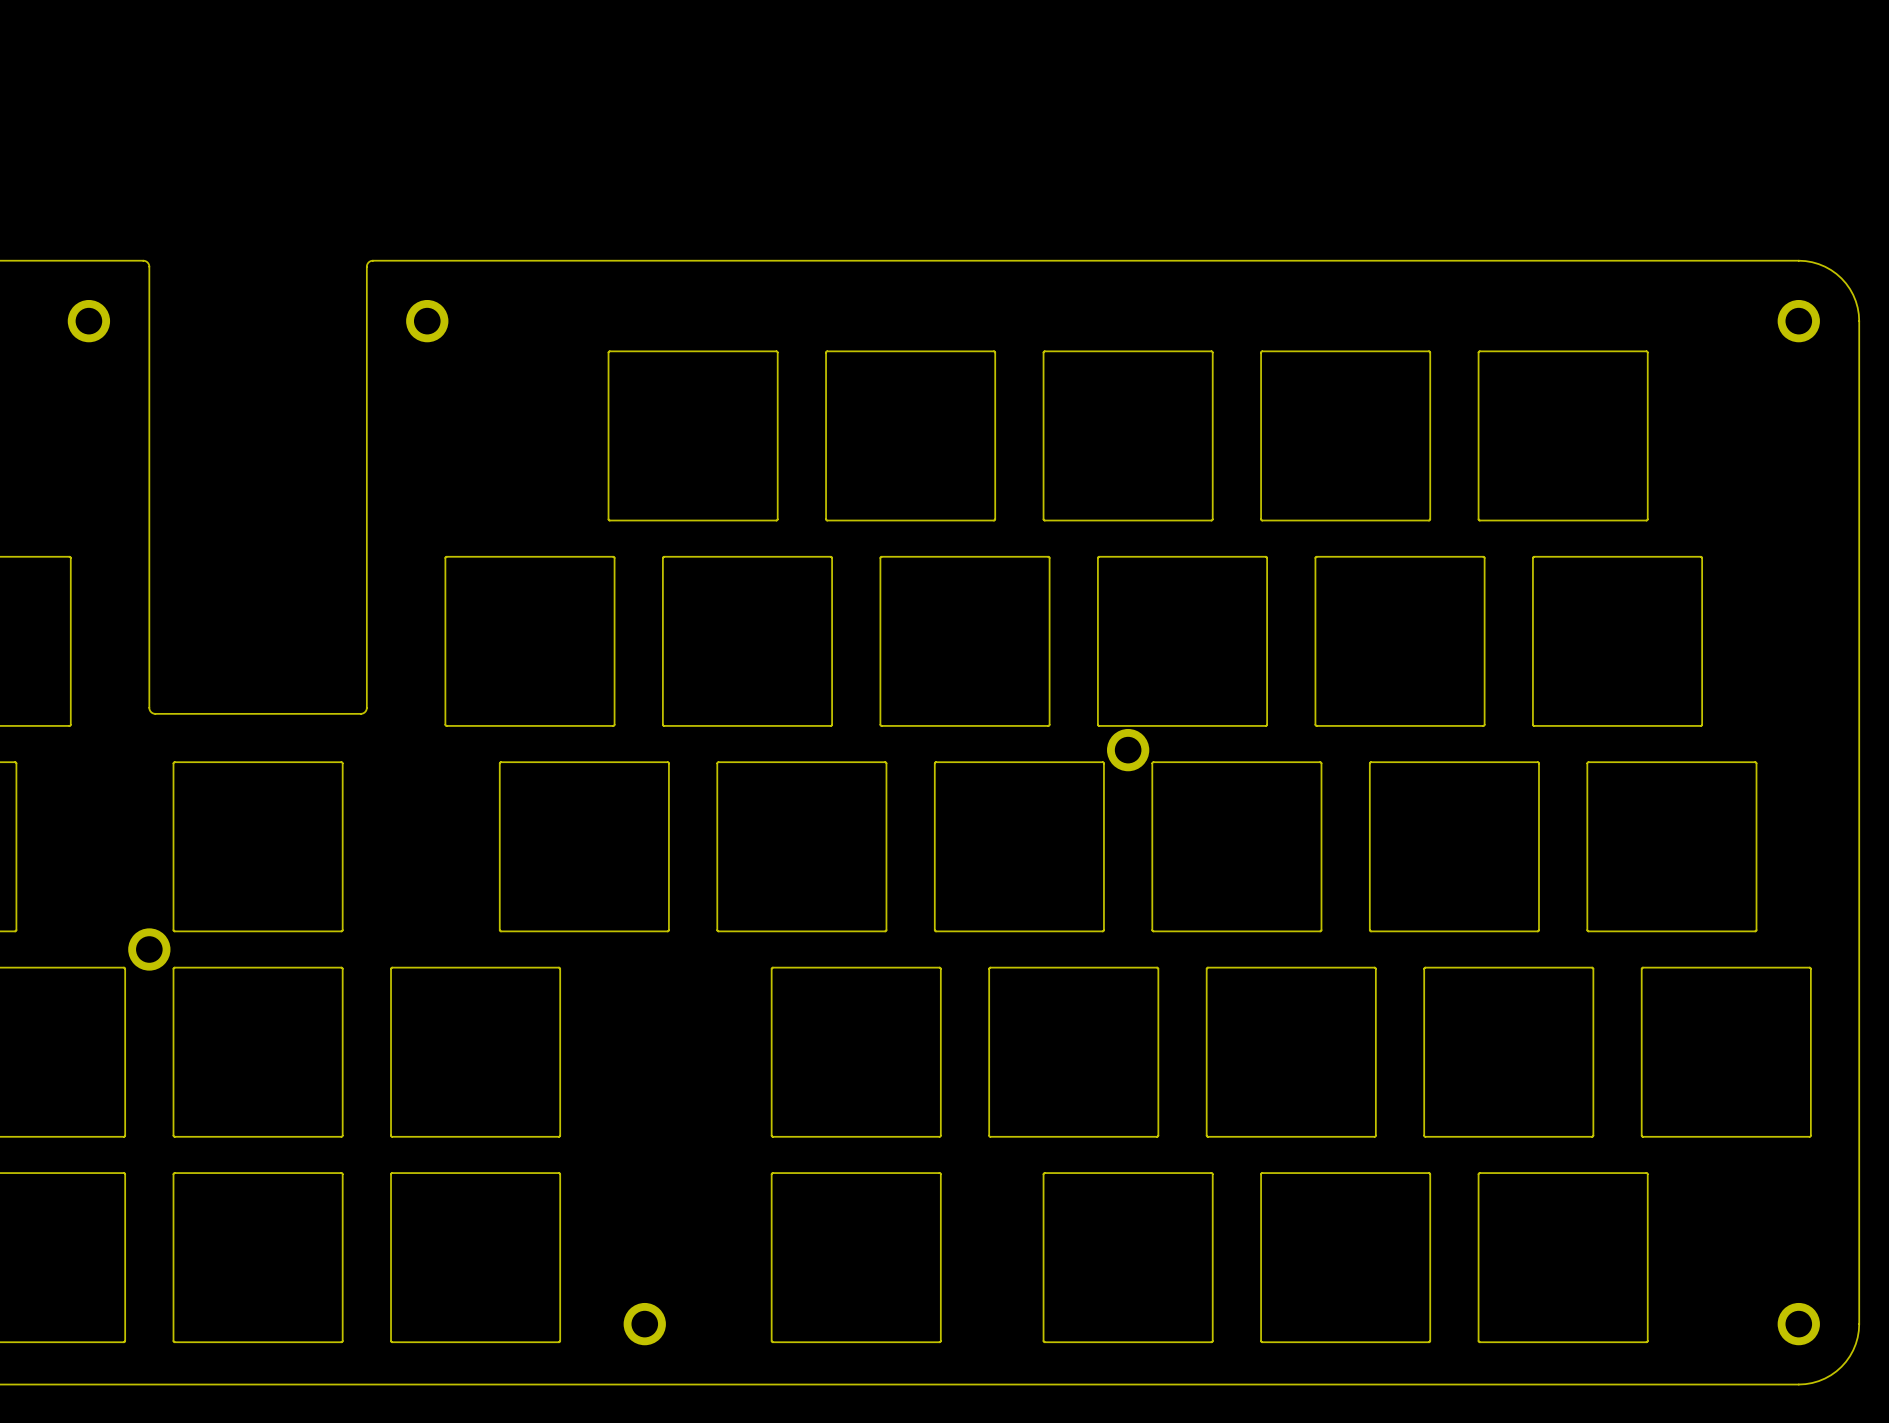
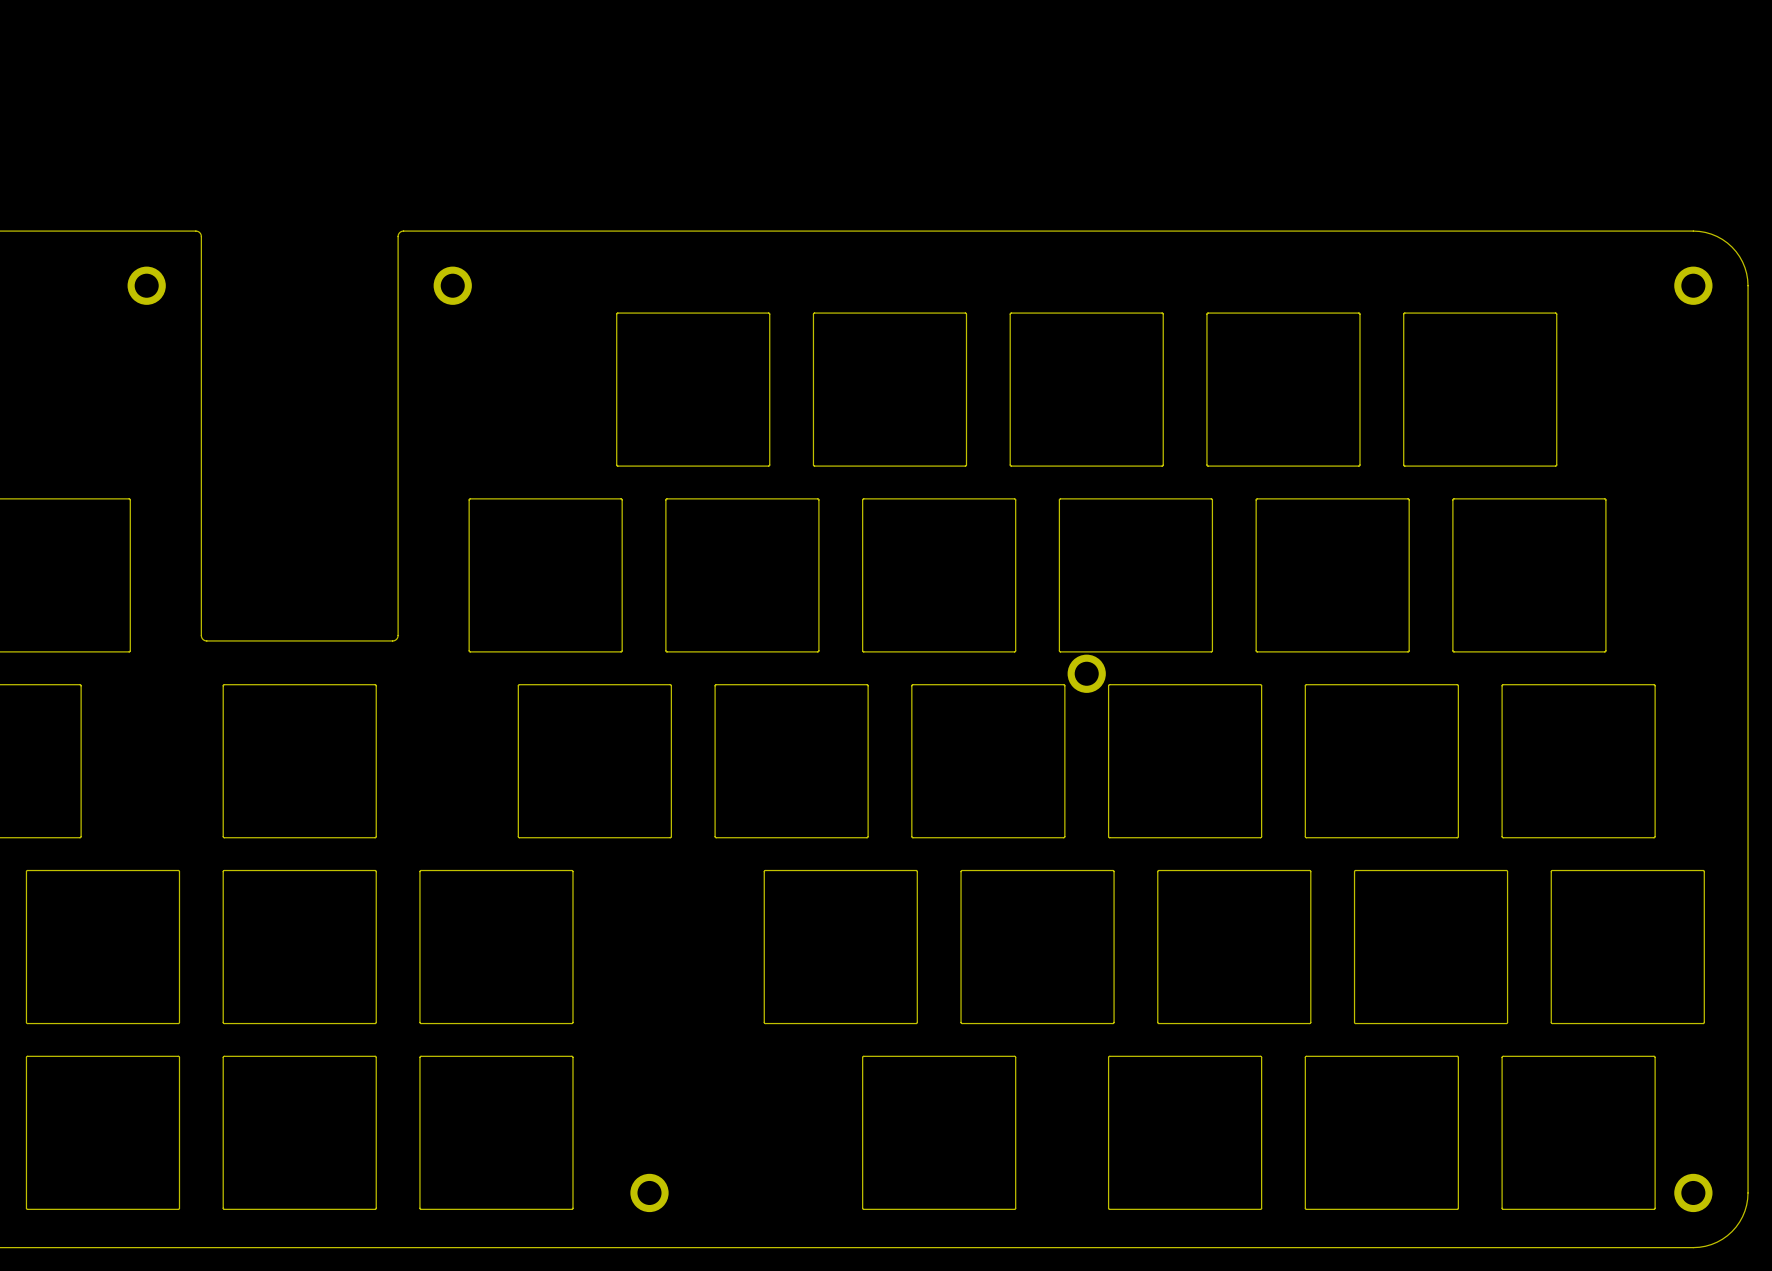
part: (149, 949) -> none
drawing: [771, 1172, 942, 1343] -> none
drawing: none -> [862, 1056, 1016, 1210]
drawing: [1043, 1172, 1214, 1343] -> none
drawing: none -> [1108, 1056, 1262, 1210]
drawing: [1260, 1172, 1431, 1343] -> none
drawing: none -> [1305, 1056, 1459, 1210]
drawing: [1478, 1172, 1649, 1343] -> none
drawing: none -> [1501, 1056, 1656, 1210]

